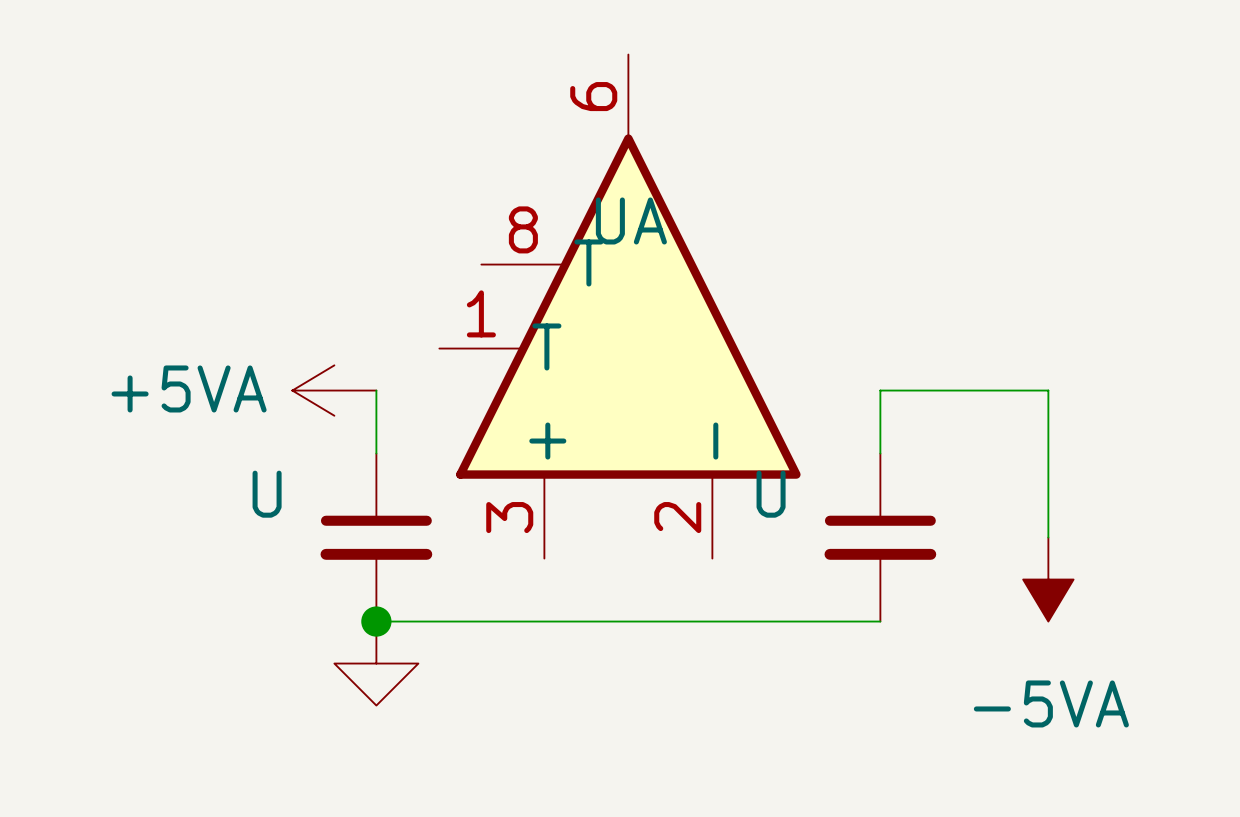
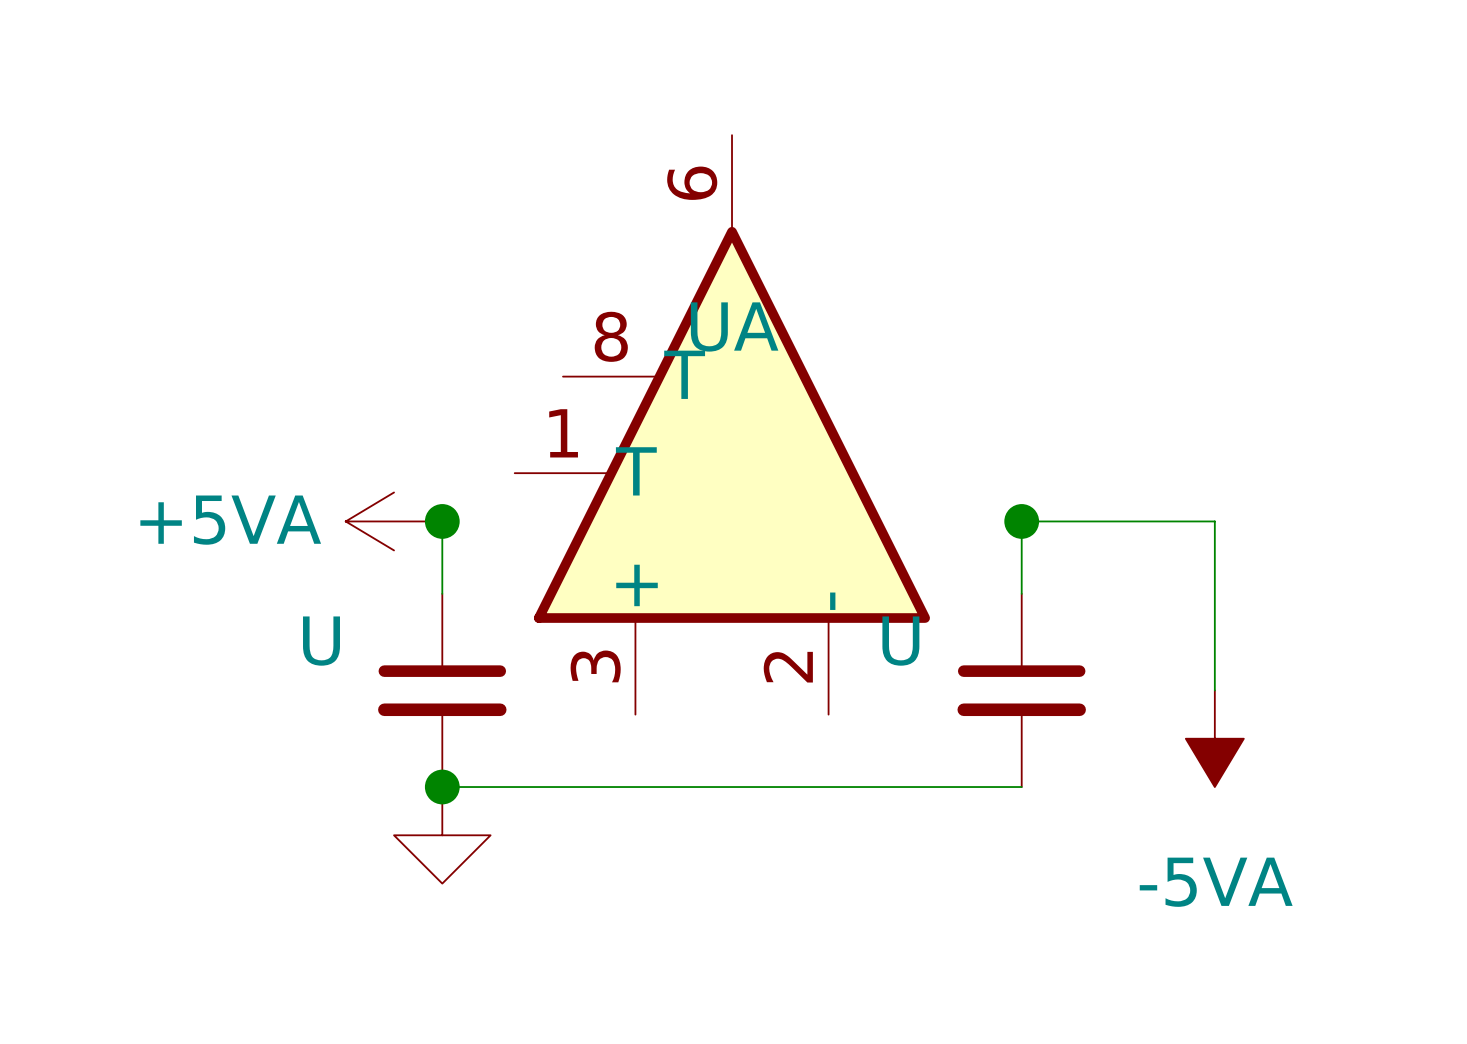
junction: none -> (442, 521)
junction: none -> (1021, 521)

